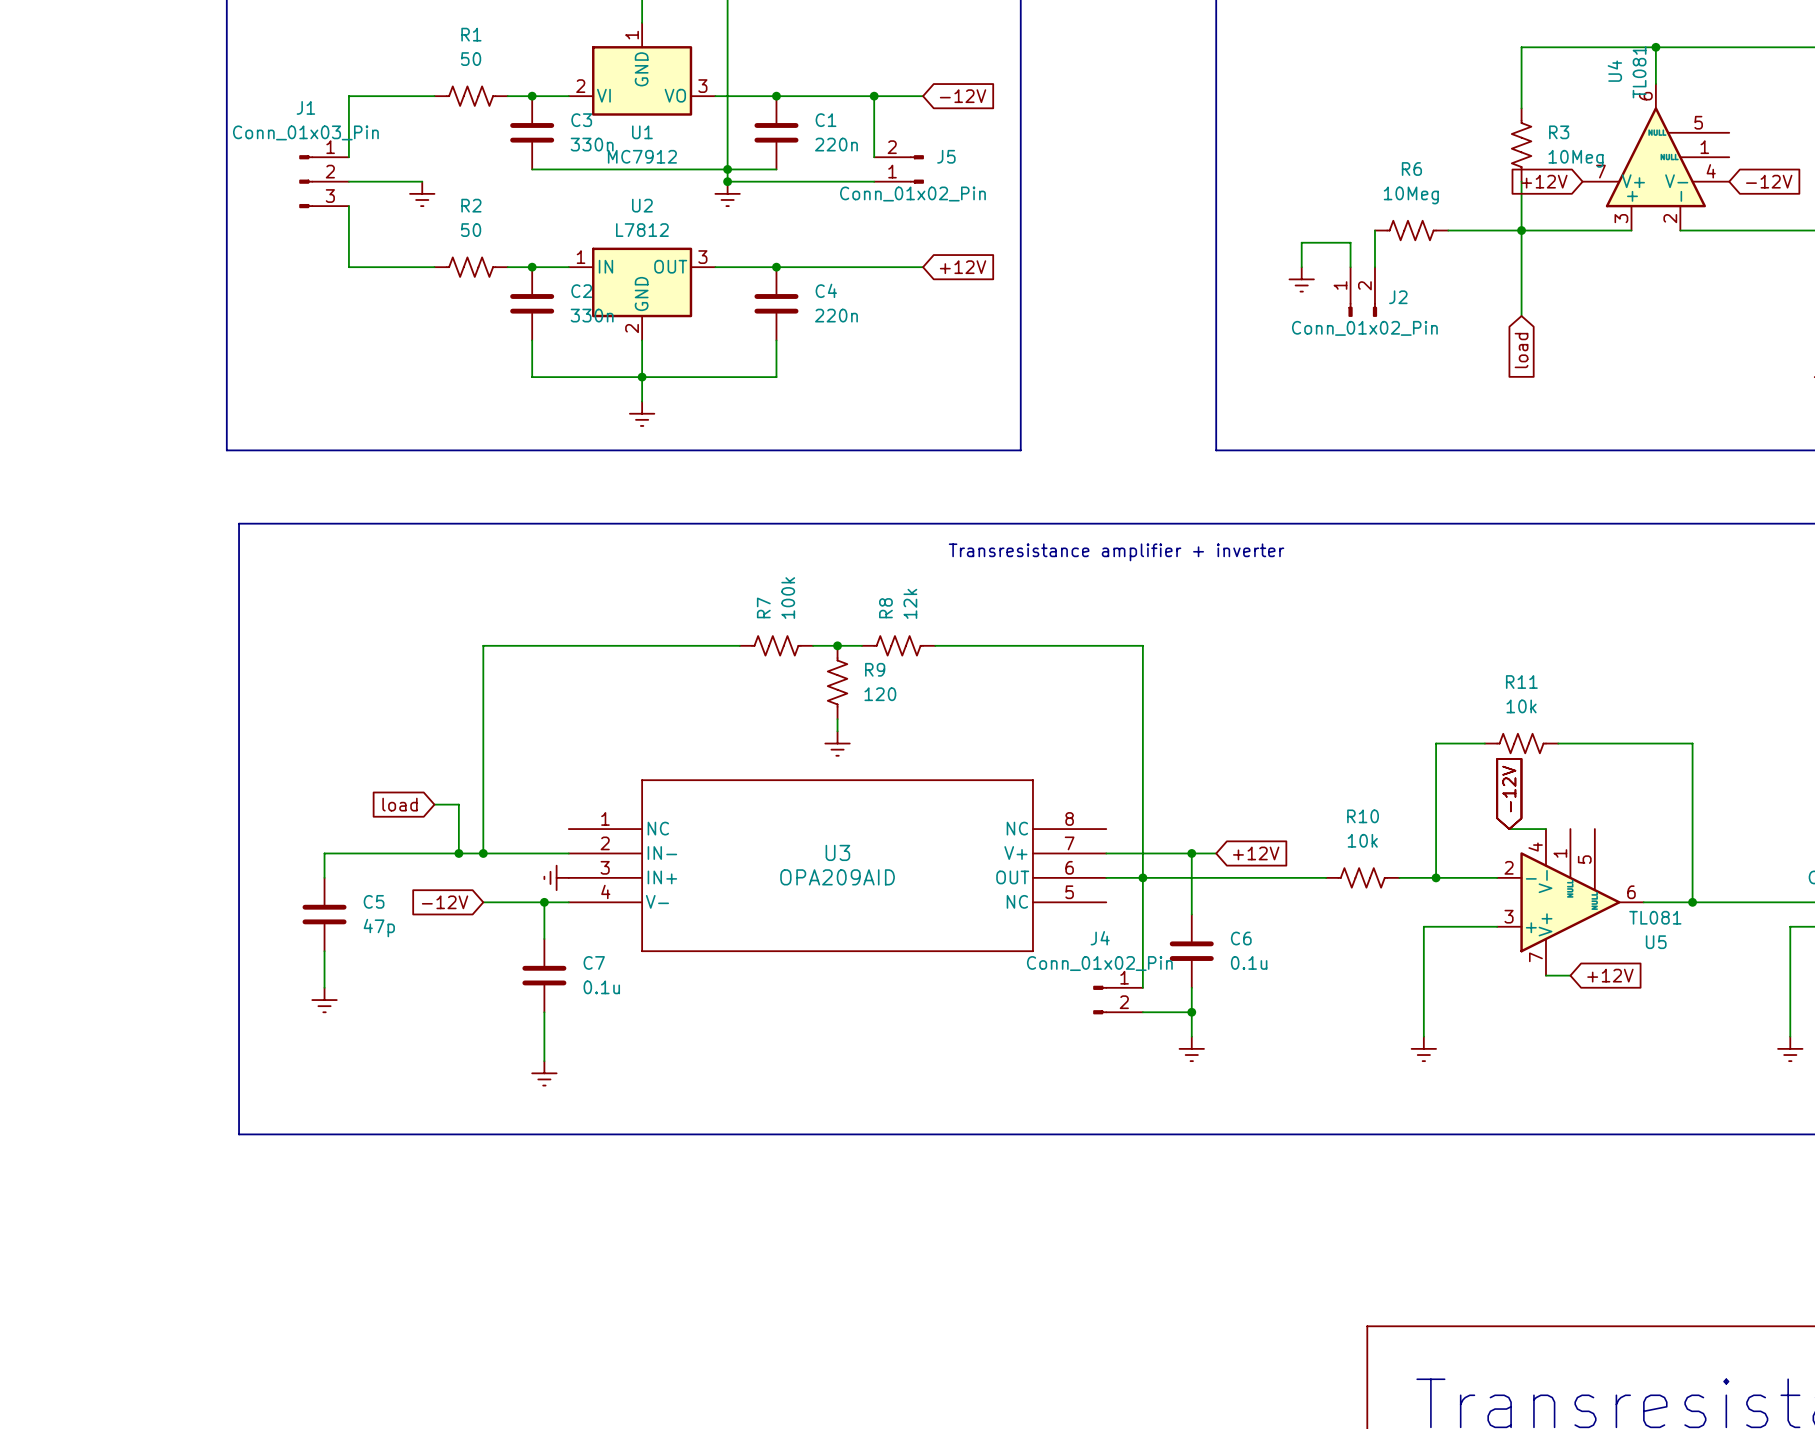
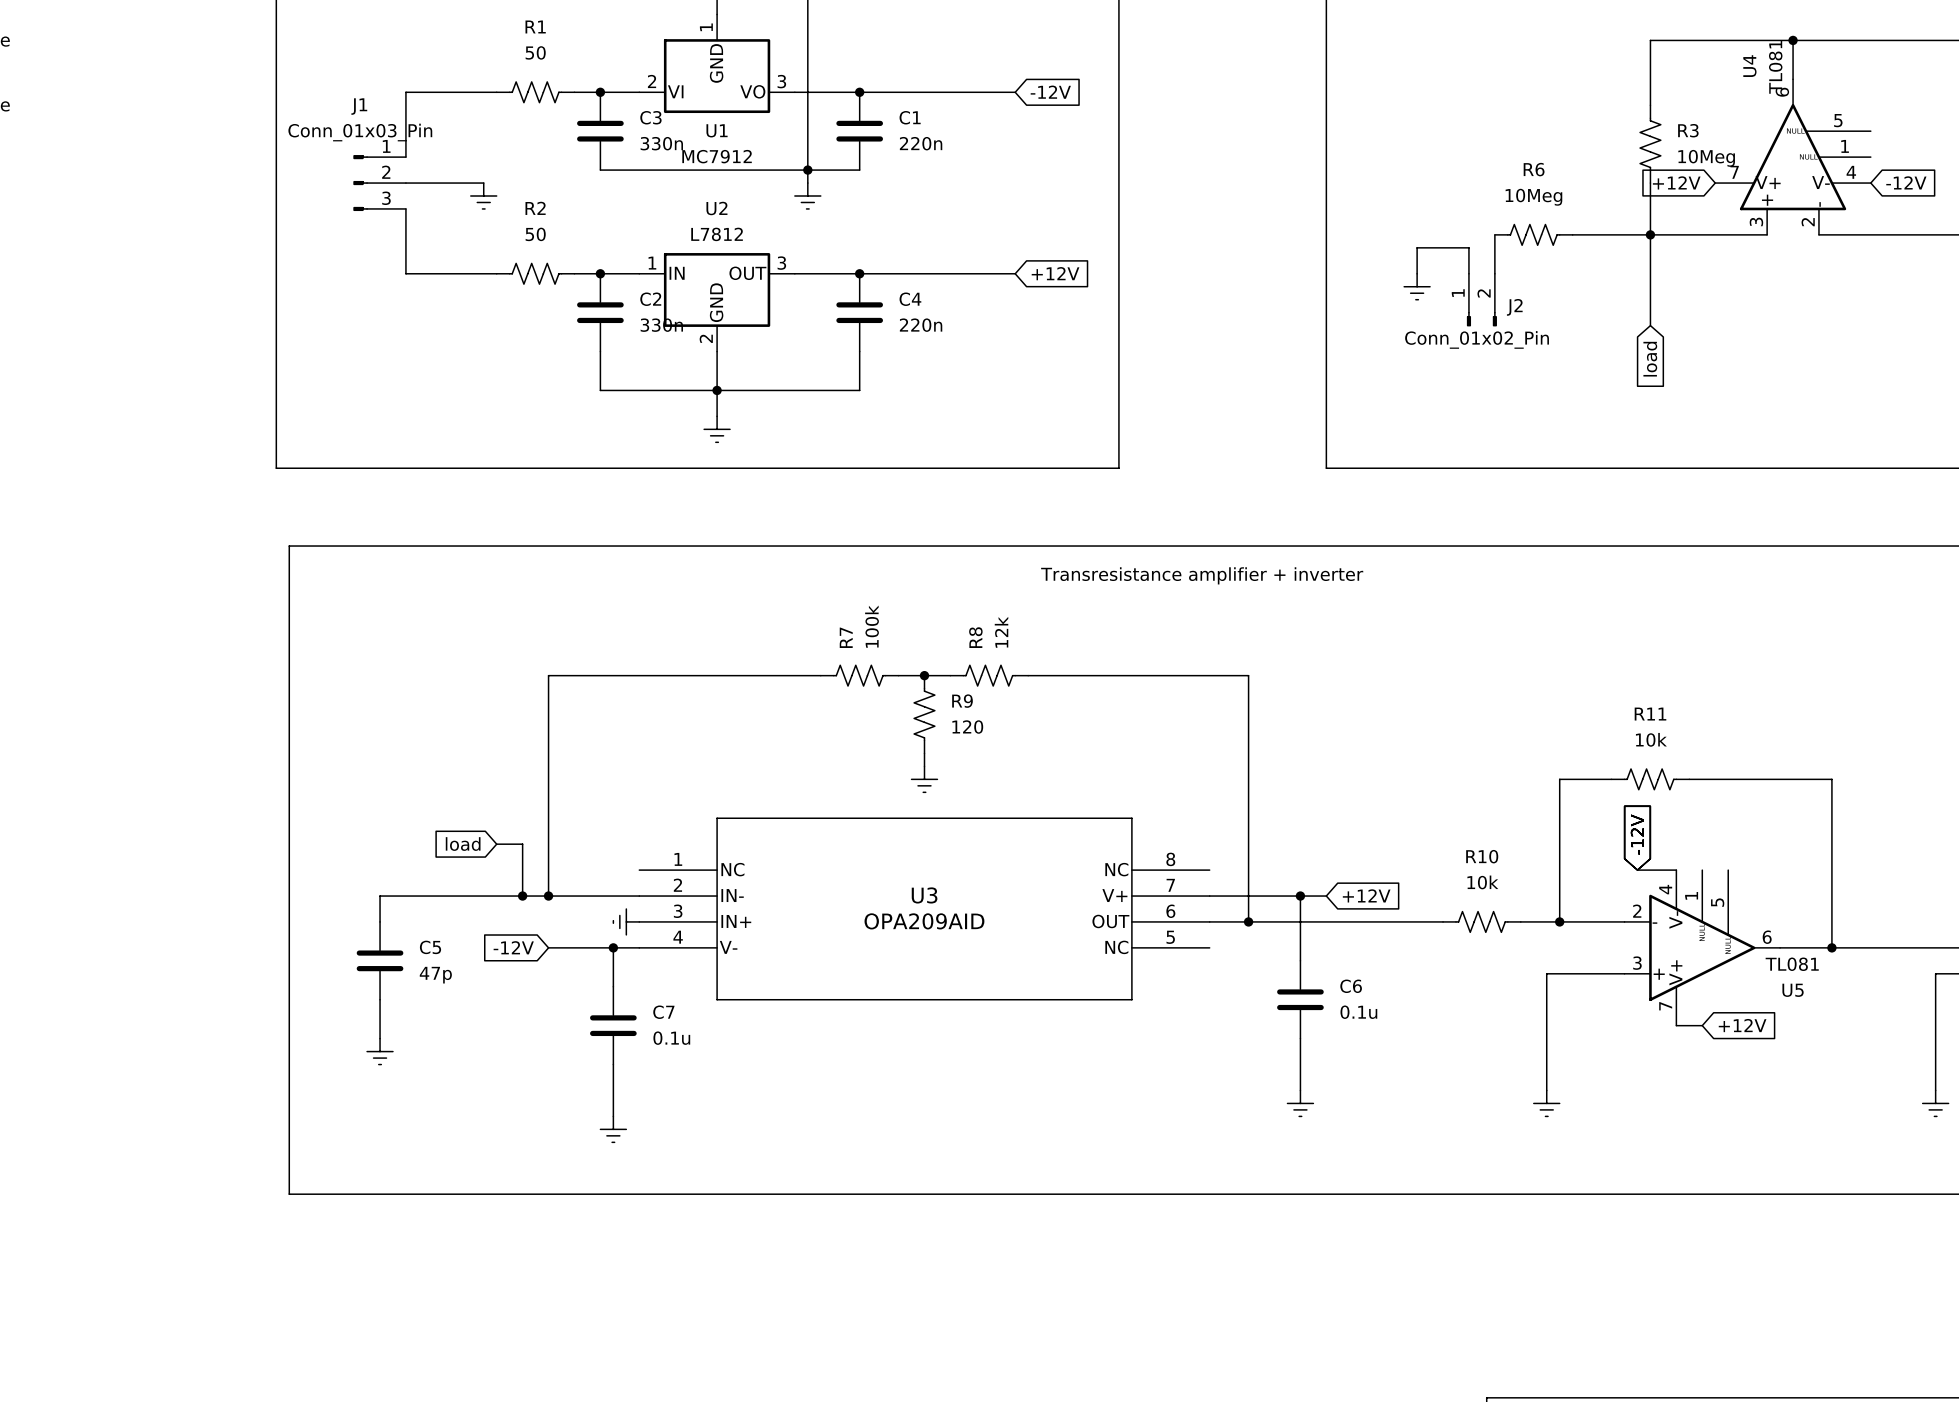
wire: (874, 96) (874, 157) -> none
junction: (874, 96) -> none
J5: Conn_01x02_Pin (898, 169) -> none
wire: (727, 181) (874, 181) -> none
junction: (727, 181) -> none
wire: (1142, 877) (1142, 987) -> none
J4: Conn_01x02_Pin (1118, 1000) -> none
wire: (1142, 1012) (1191, 1012) -> none
junction: (1191, 1012) -> none

